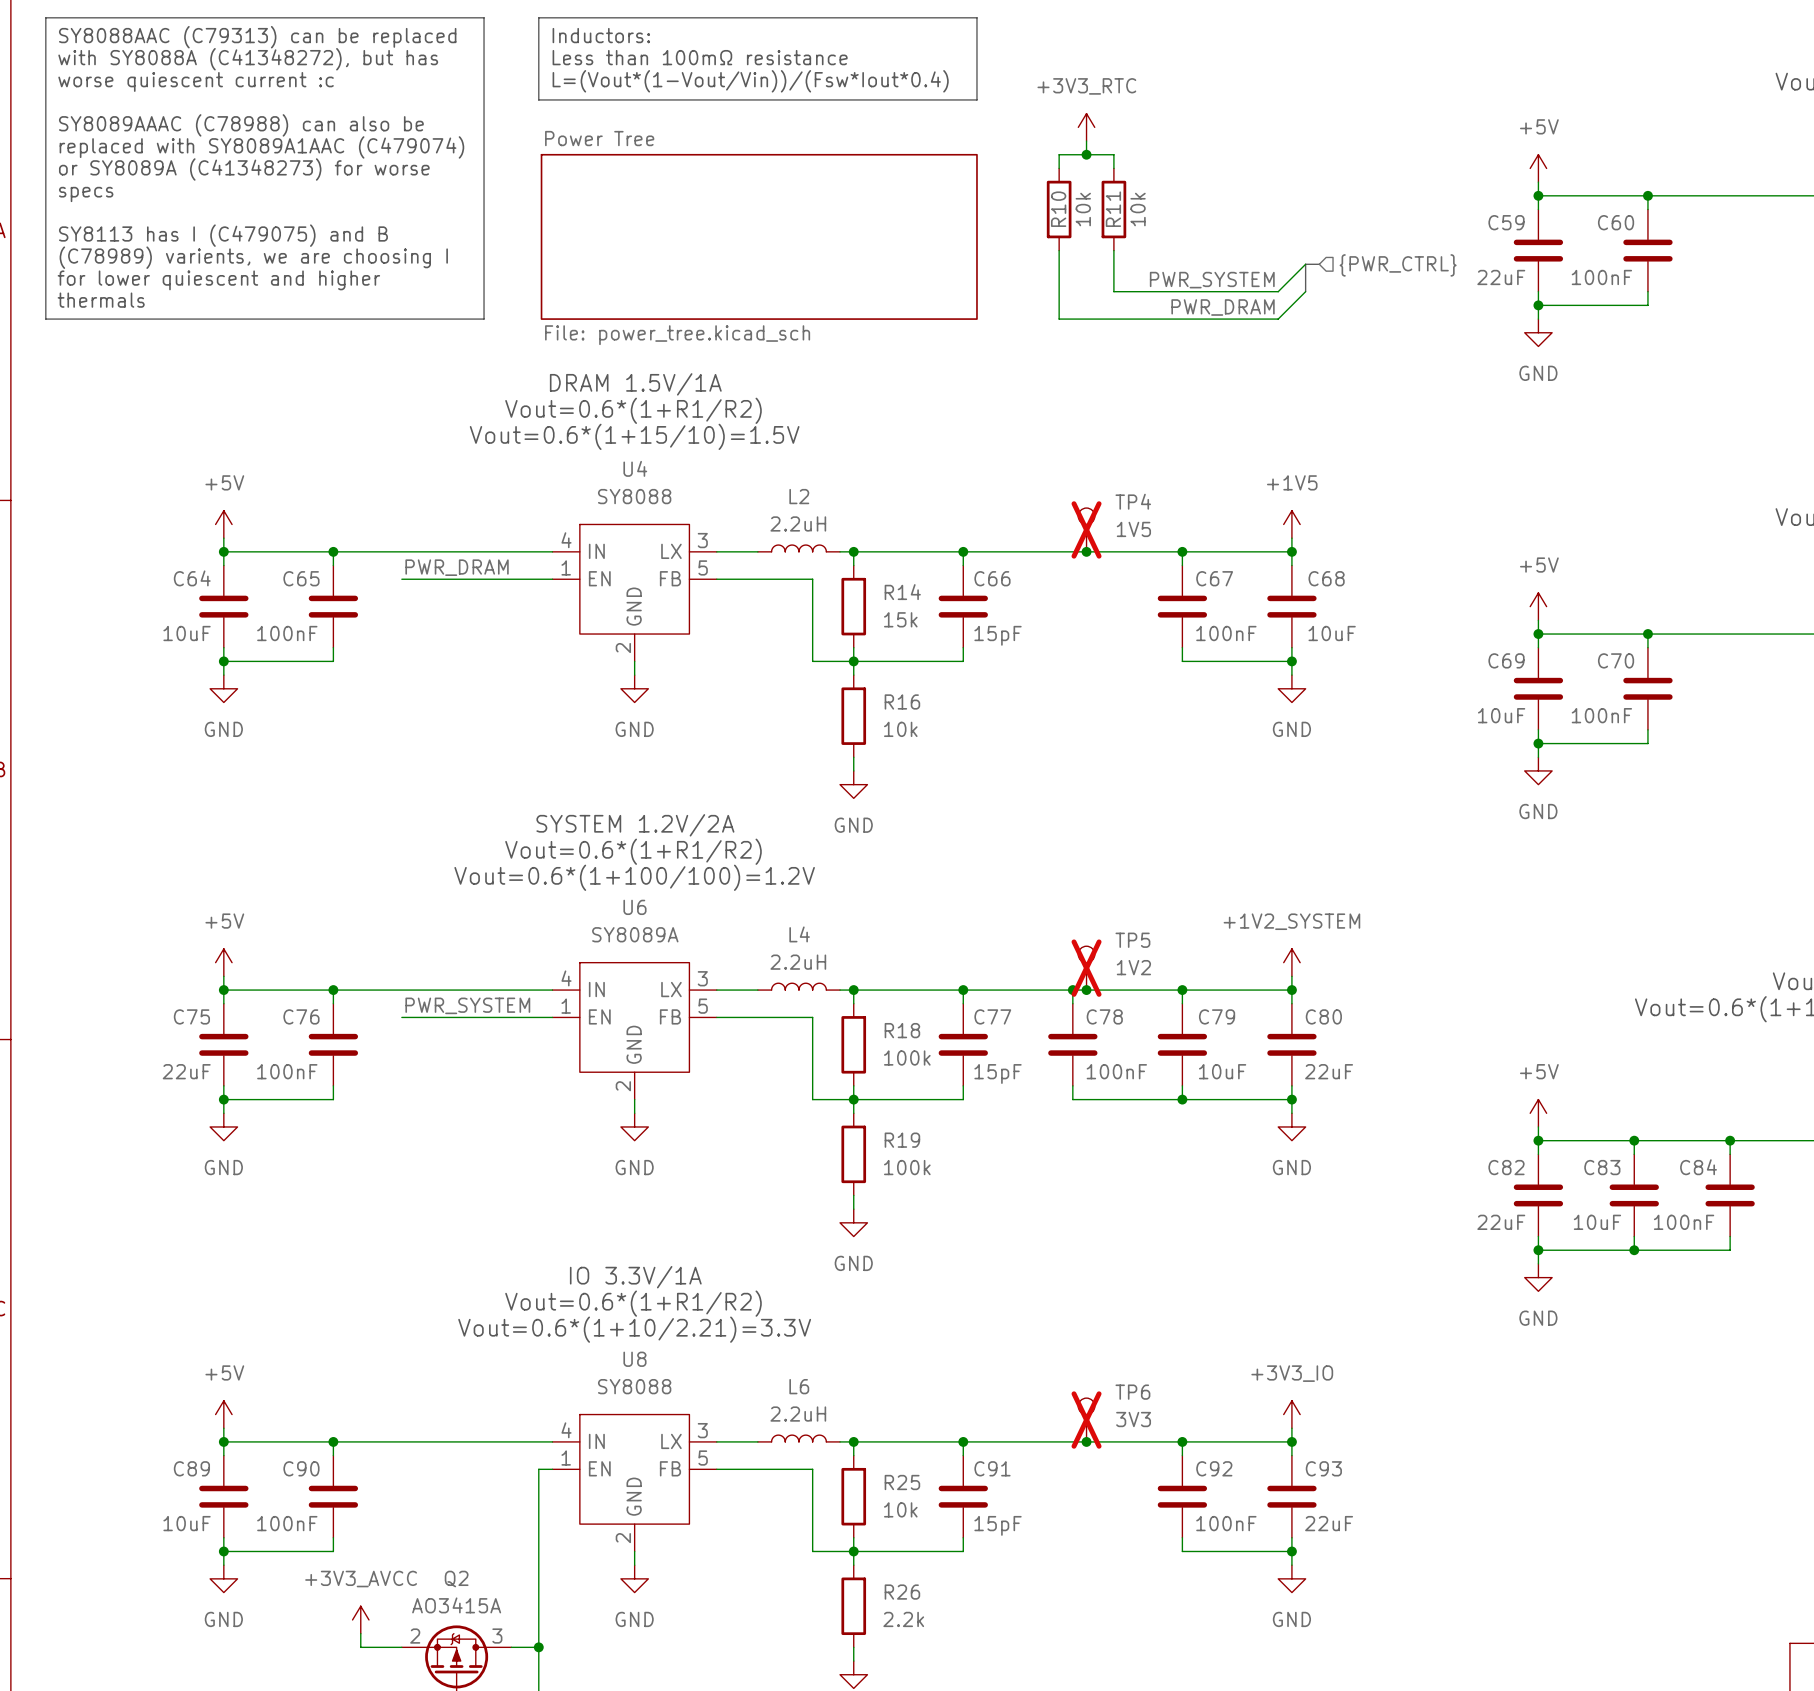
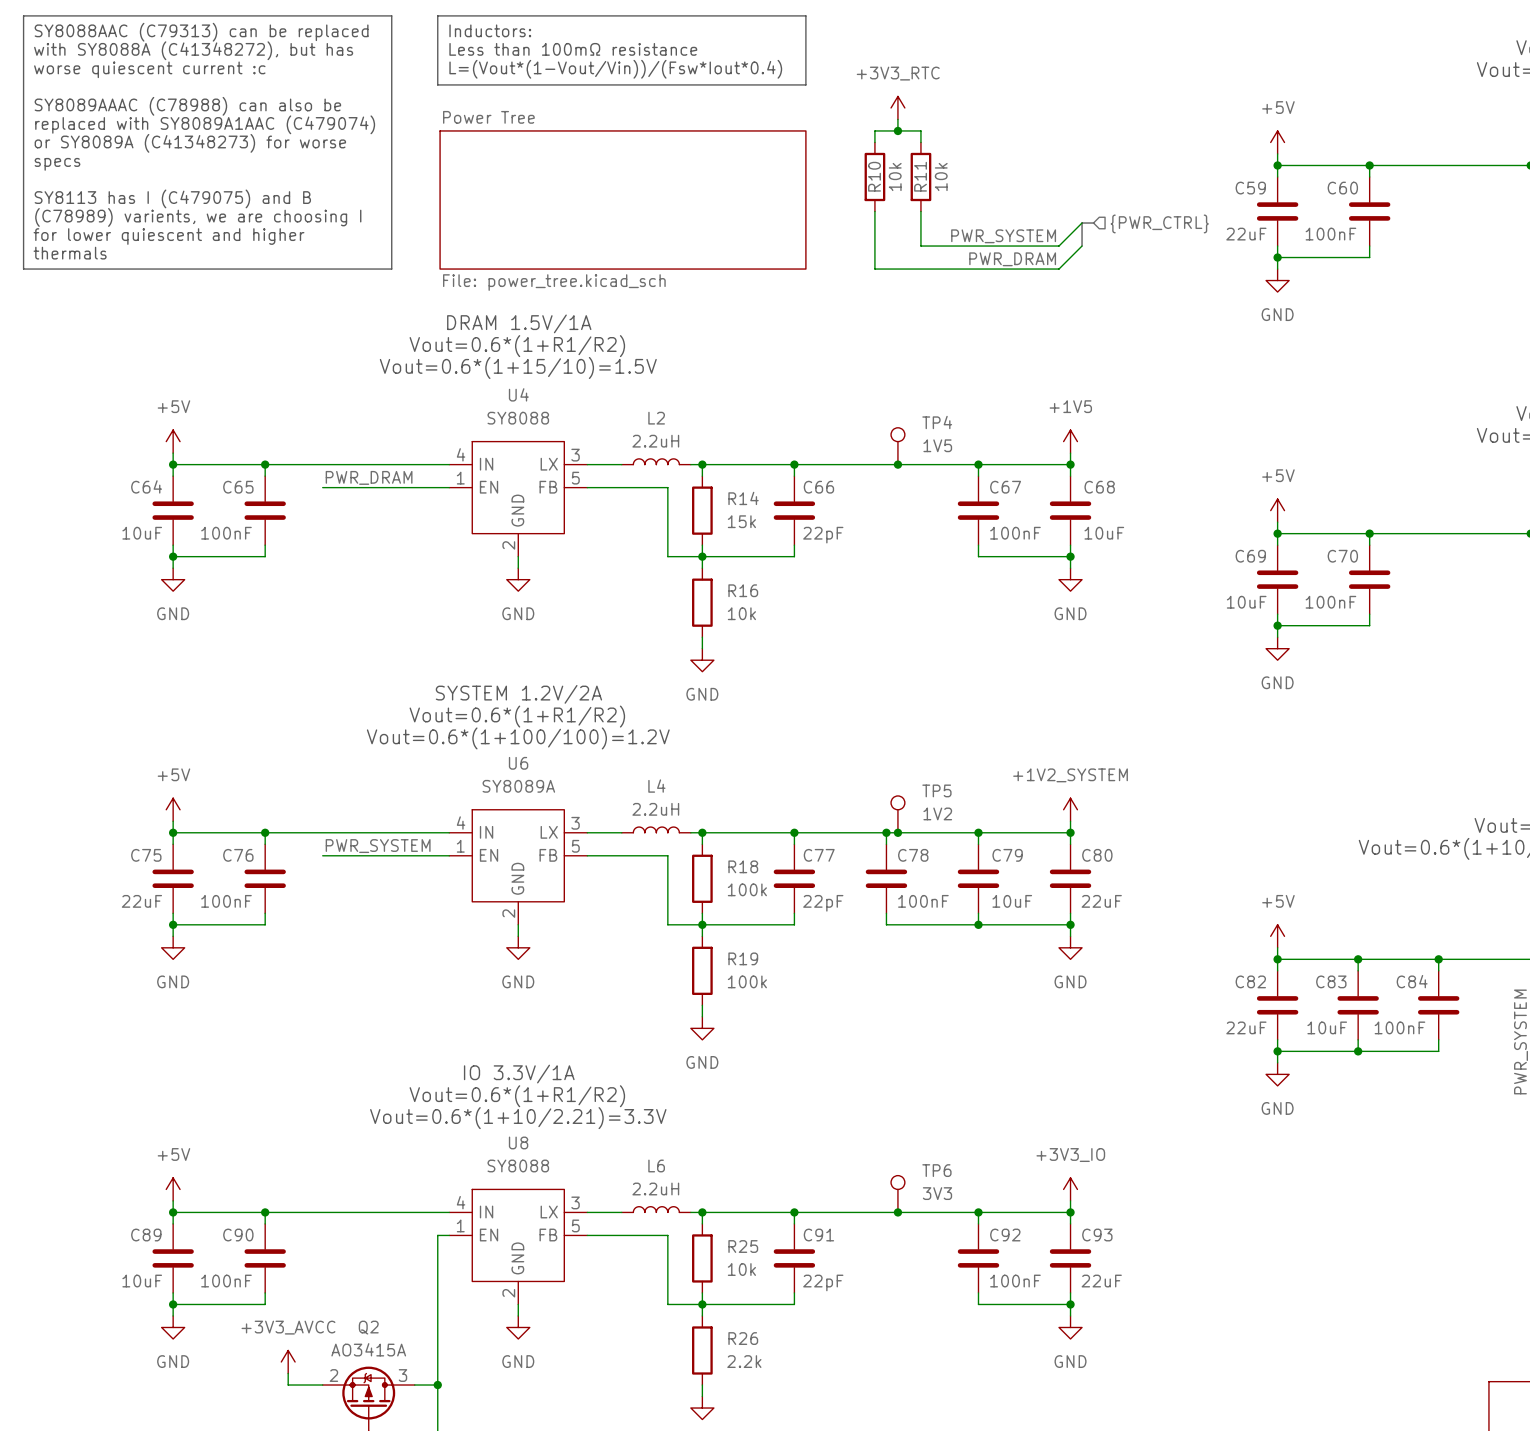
TP4 do-not-place cross: (1086, 529) -> none
C66 value: 15pF (998, 635) -> 22pF (823, 535)
TP5 do-not-place cross: (1086, 968) -> none
C77 value: 15pF (998, 1073) -> 22pF (823, 903)
TP6 do-not-place cross: (1086, 1420) -> none
C91 value: 15pF (998, 1525) -> 22pF (823, 1282)

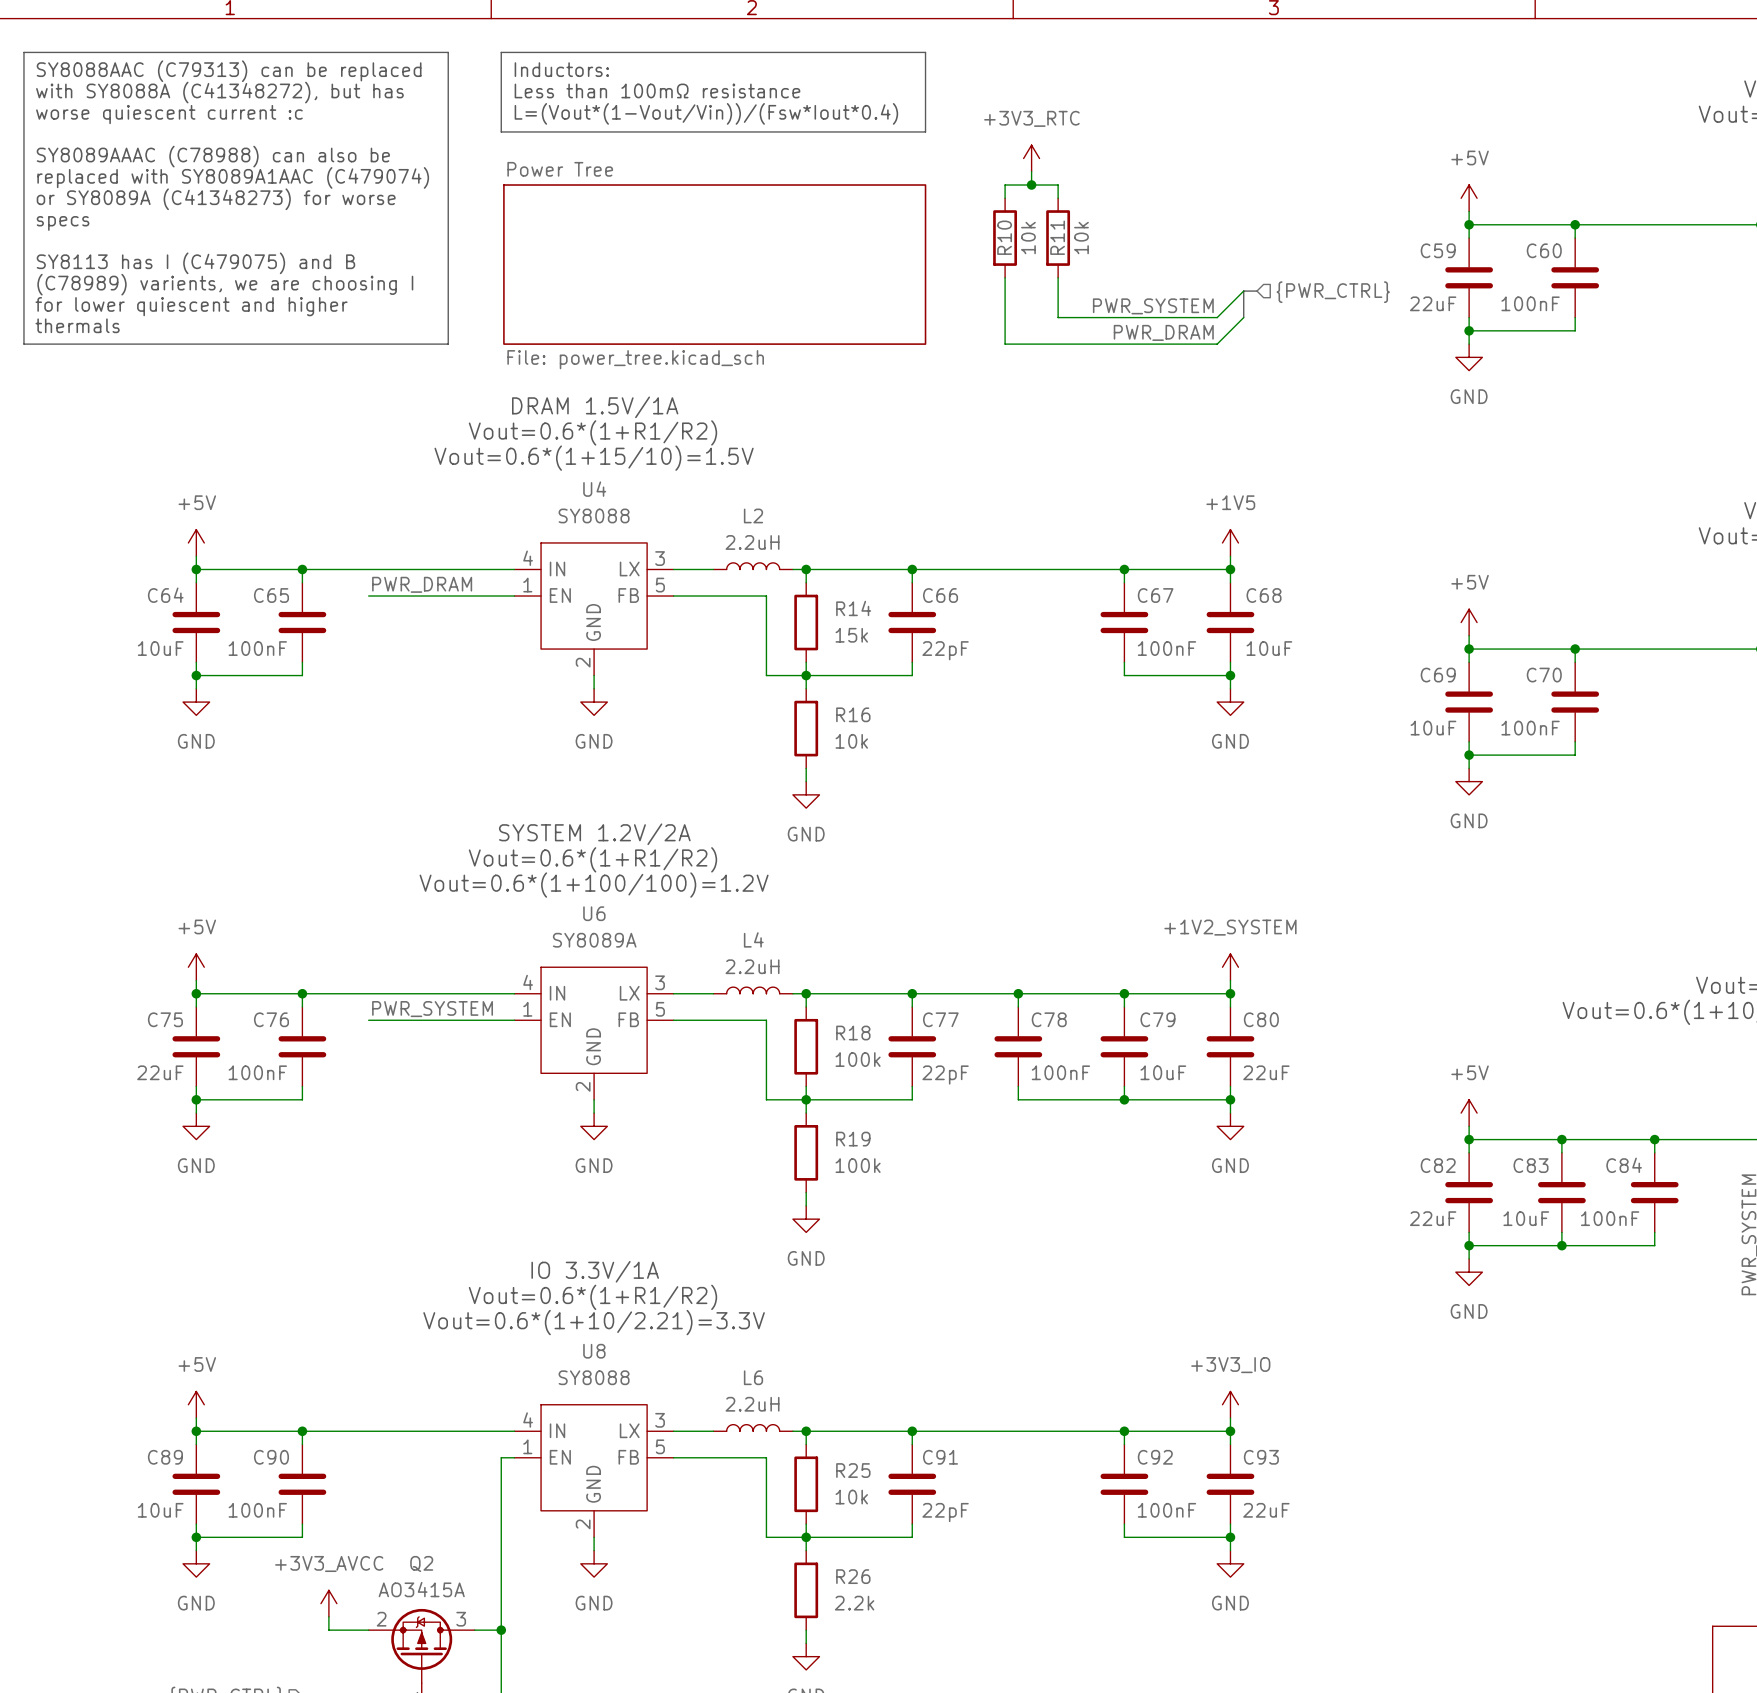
TP4: 1V5 (897, 446) -> none
junction: (897, 464) -> none
TP5: 1V2 (897, 814) -> none
junction: (897, 832) -> none
TP6: 3V3 (897, 1194) -> none
junction: (897, 1212) -> none

